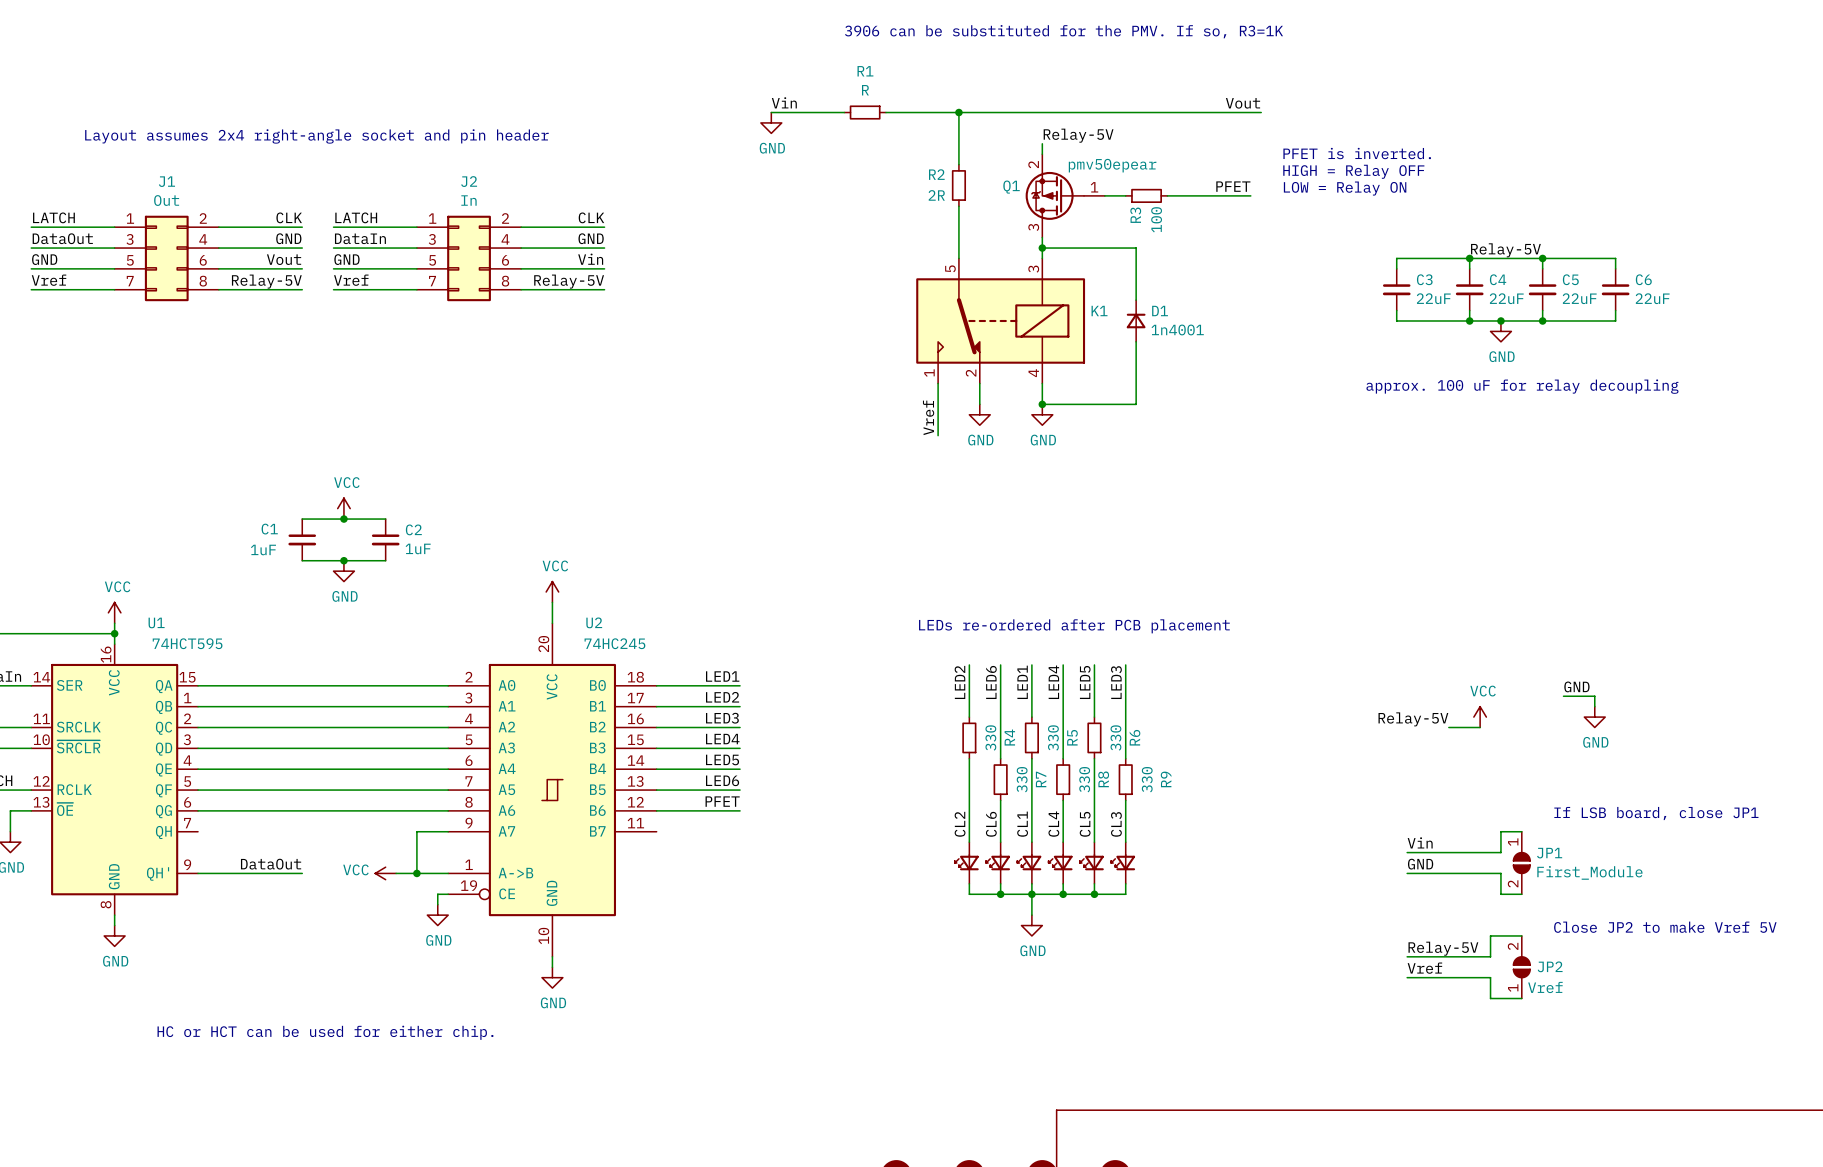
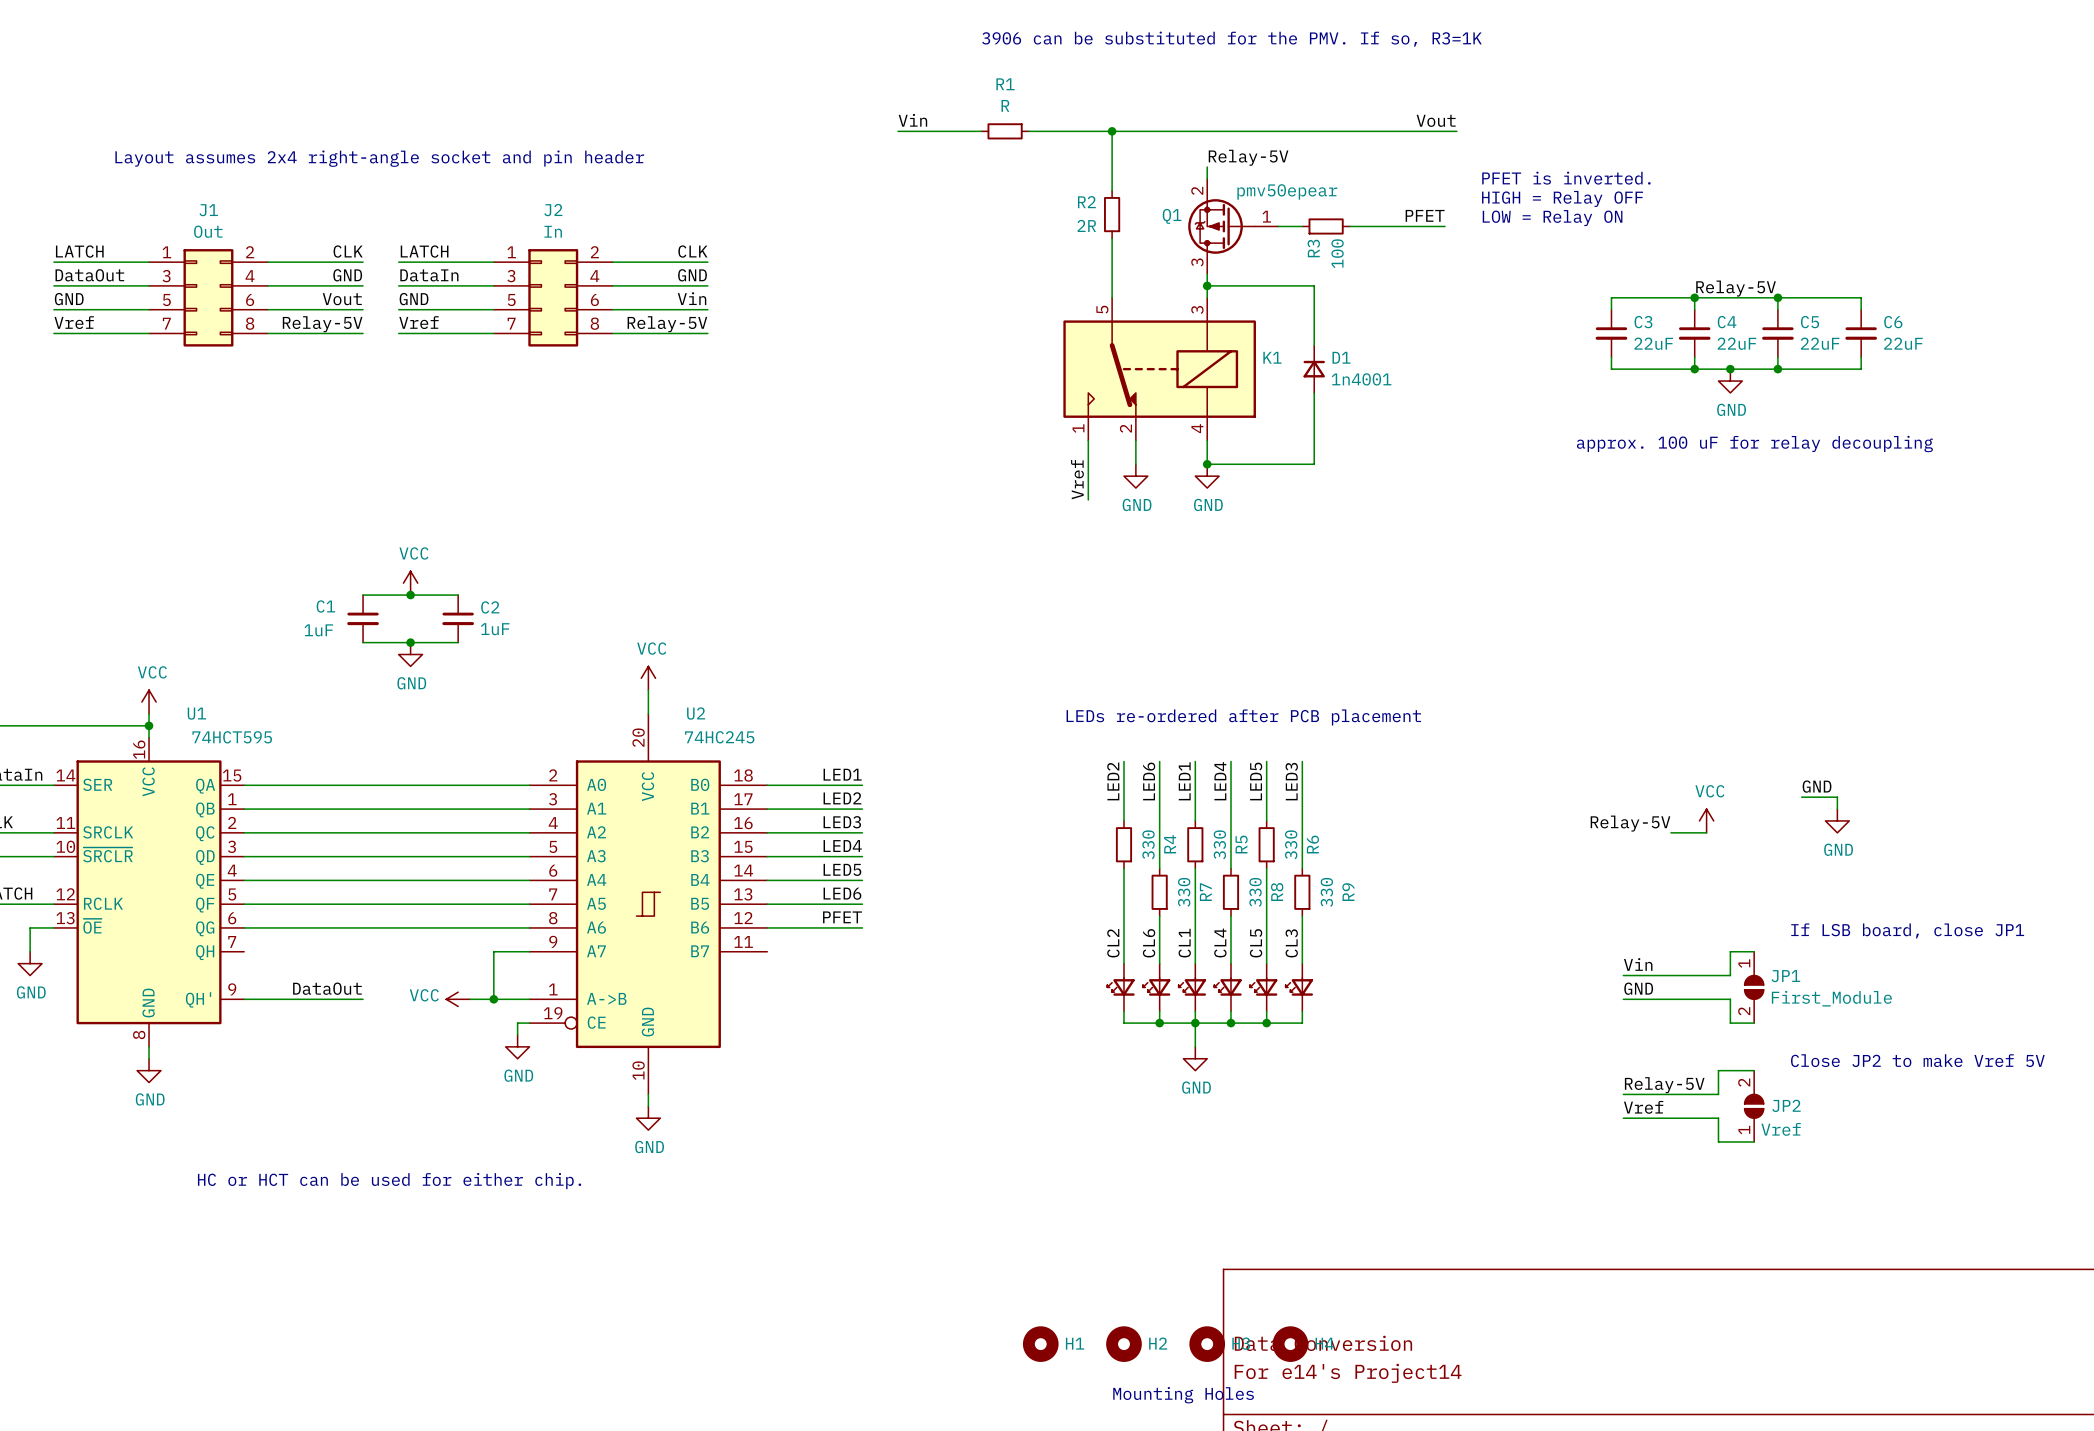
power symbol: GND (771, 122) -> none

